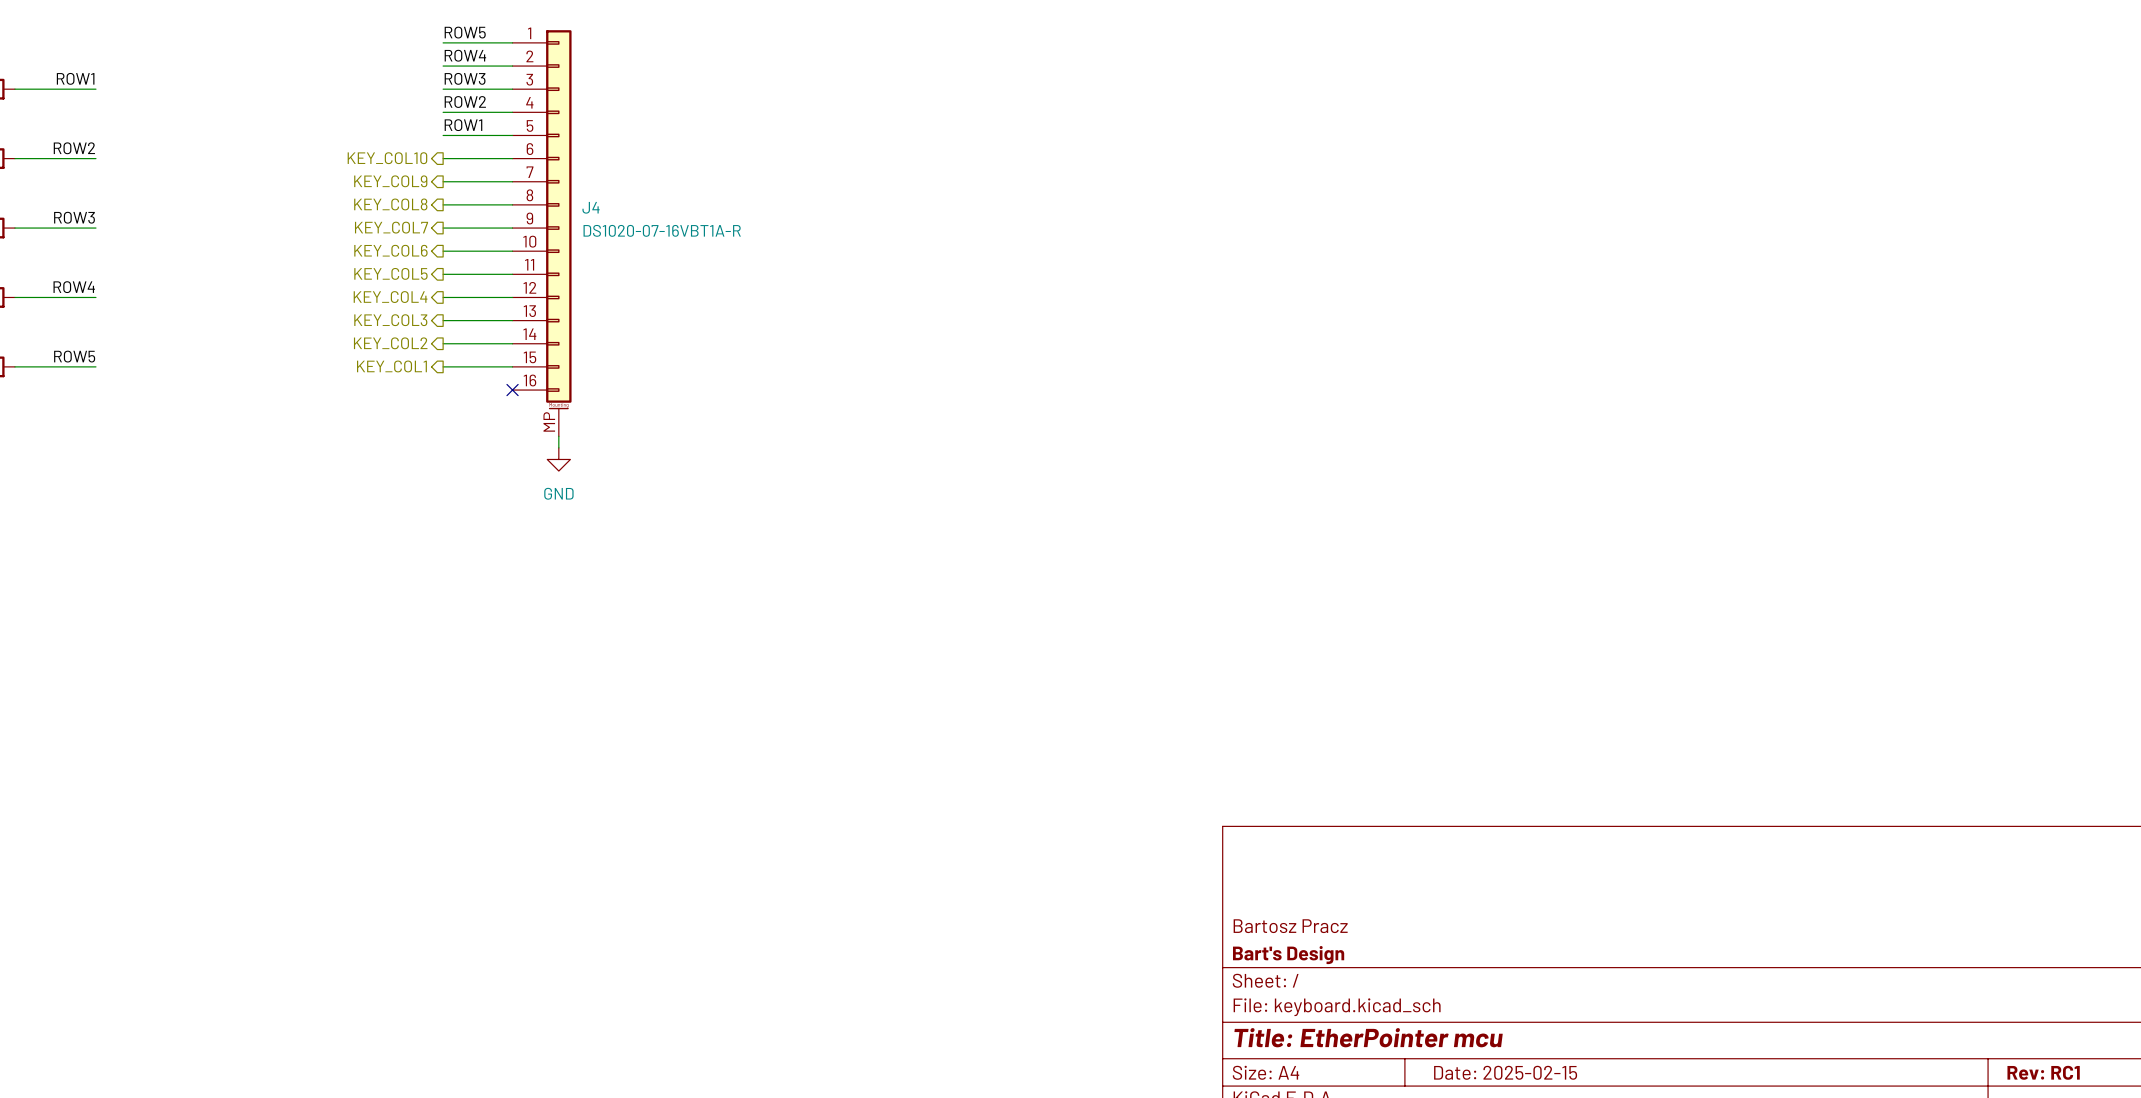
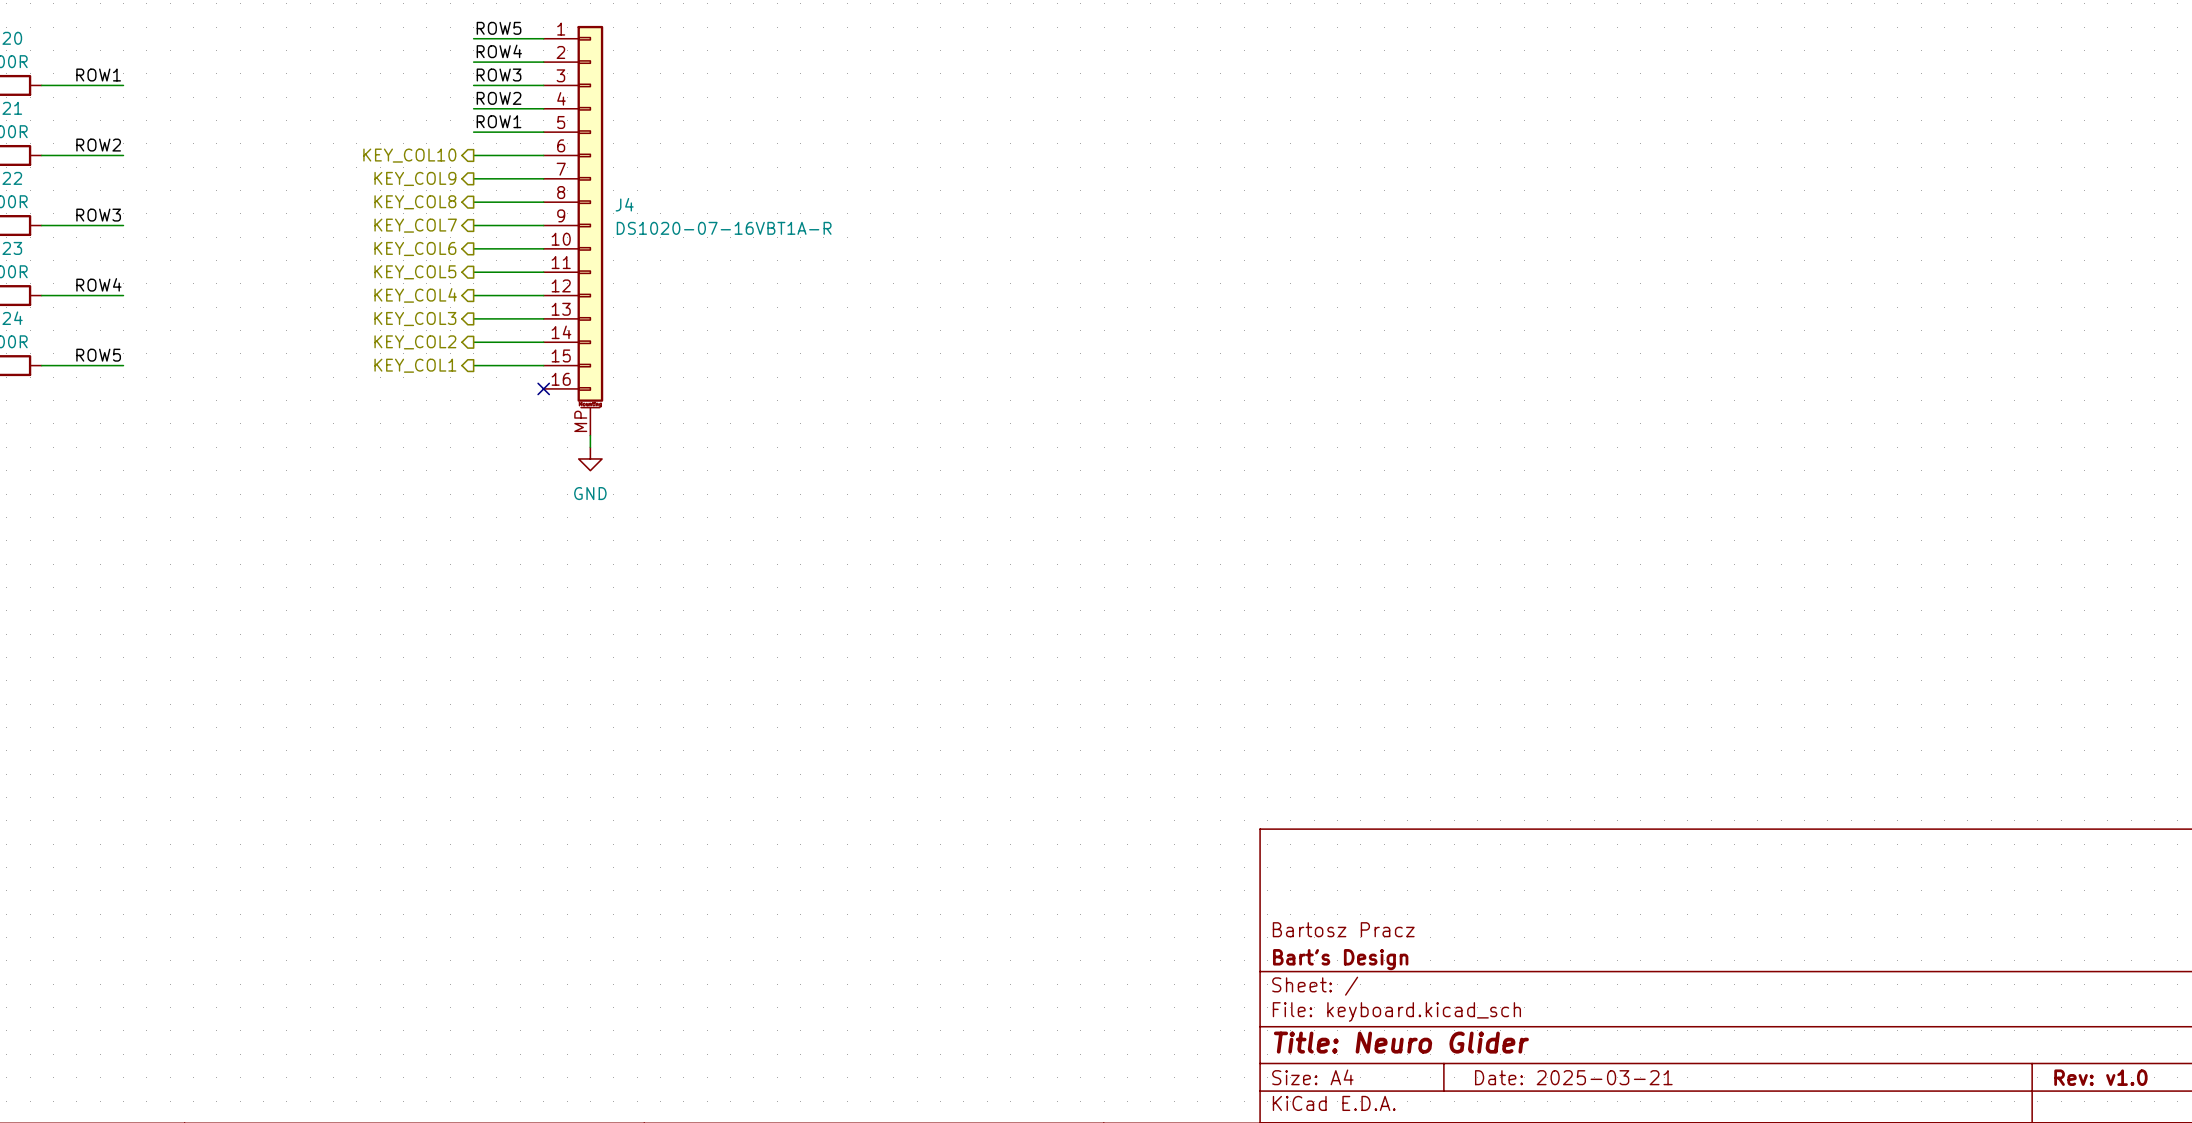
title block: Title: EtherPointer mcu (1368, 1037) -> Title: Neuro Glider (1401, 1042)
title block: Date: 2025-02-15 (1505, 1072) -> Date: 2025-03-21 (1573, 1077)
title block: Rev: RC1 (2043, 1072) -> Rev: v1.0 (2100, 1077)

